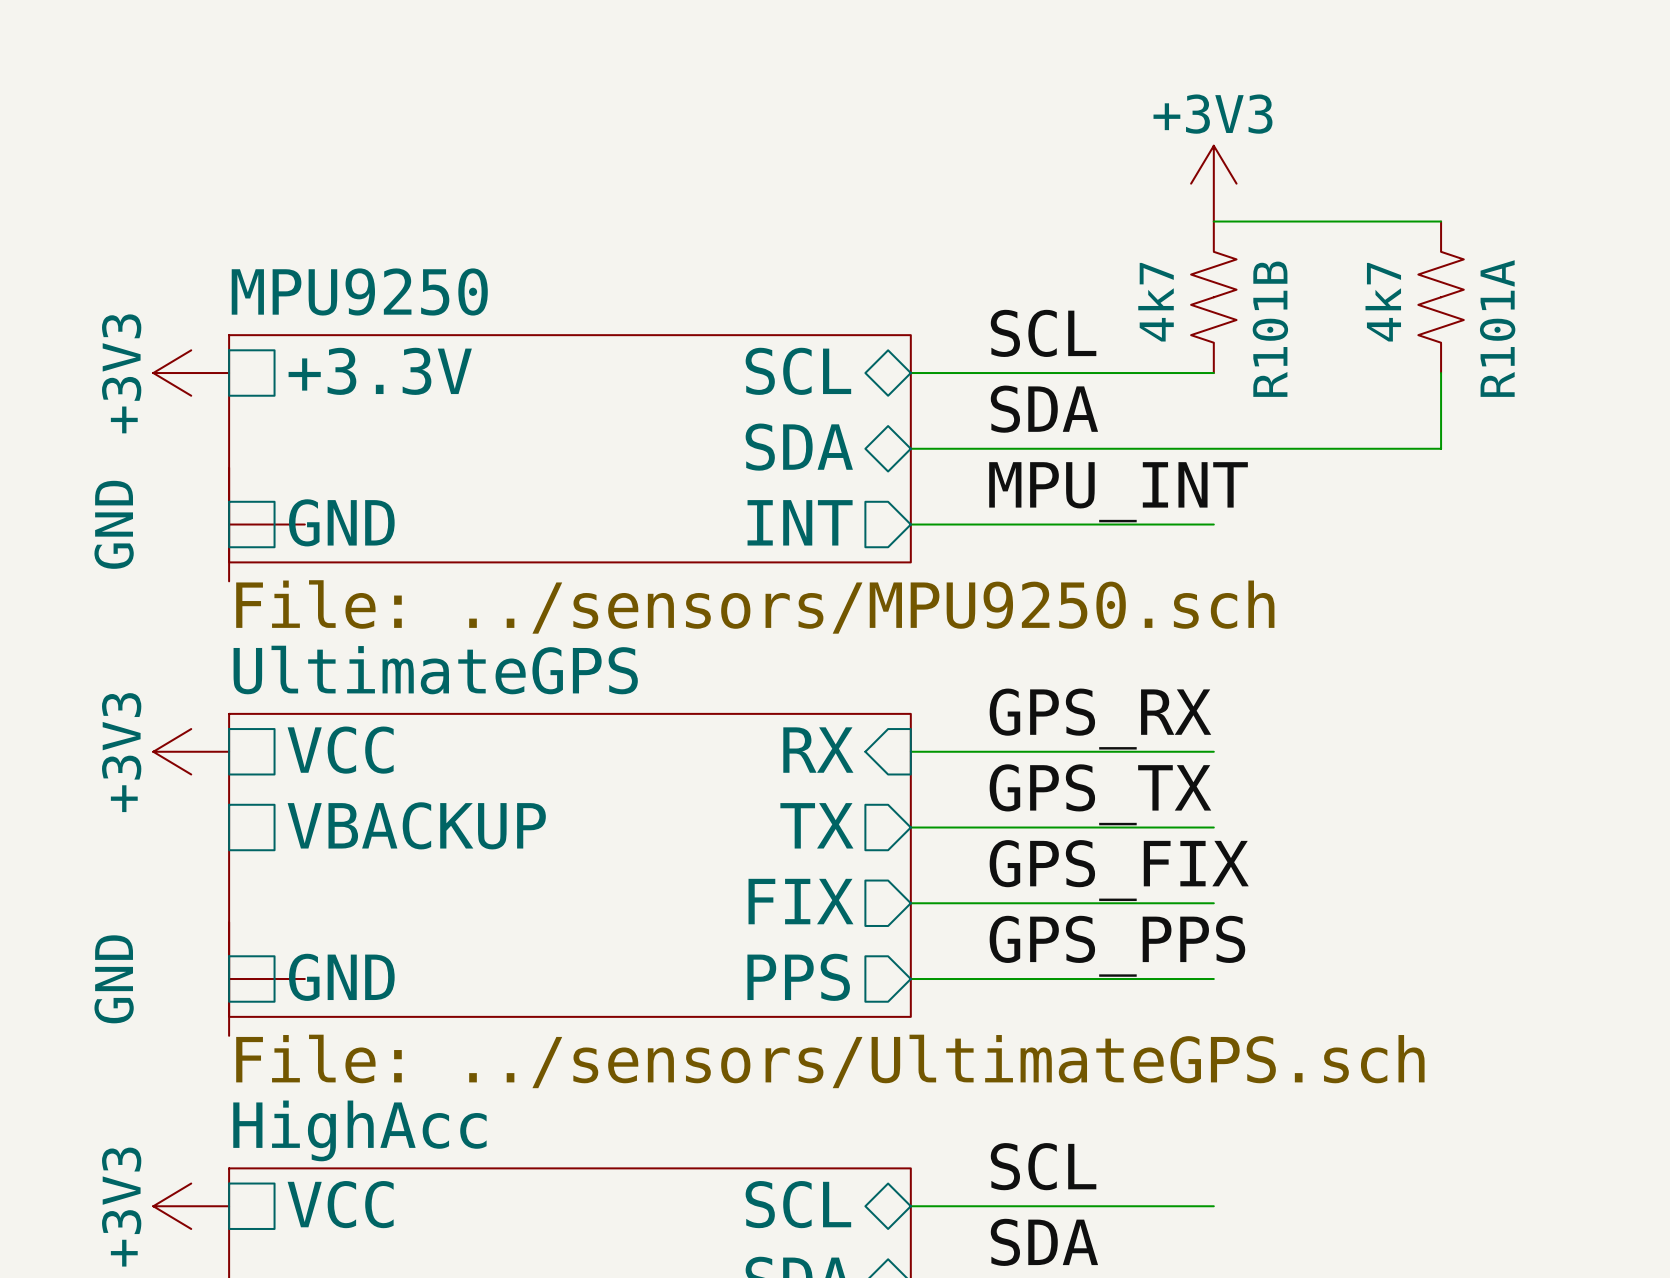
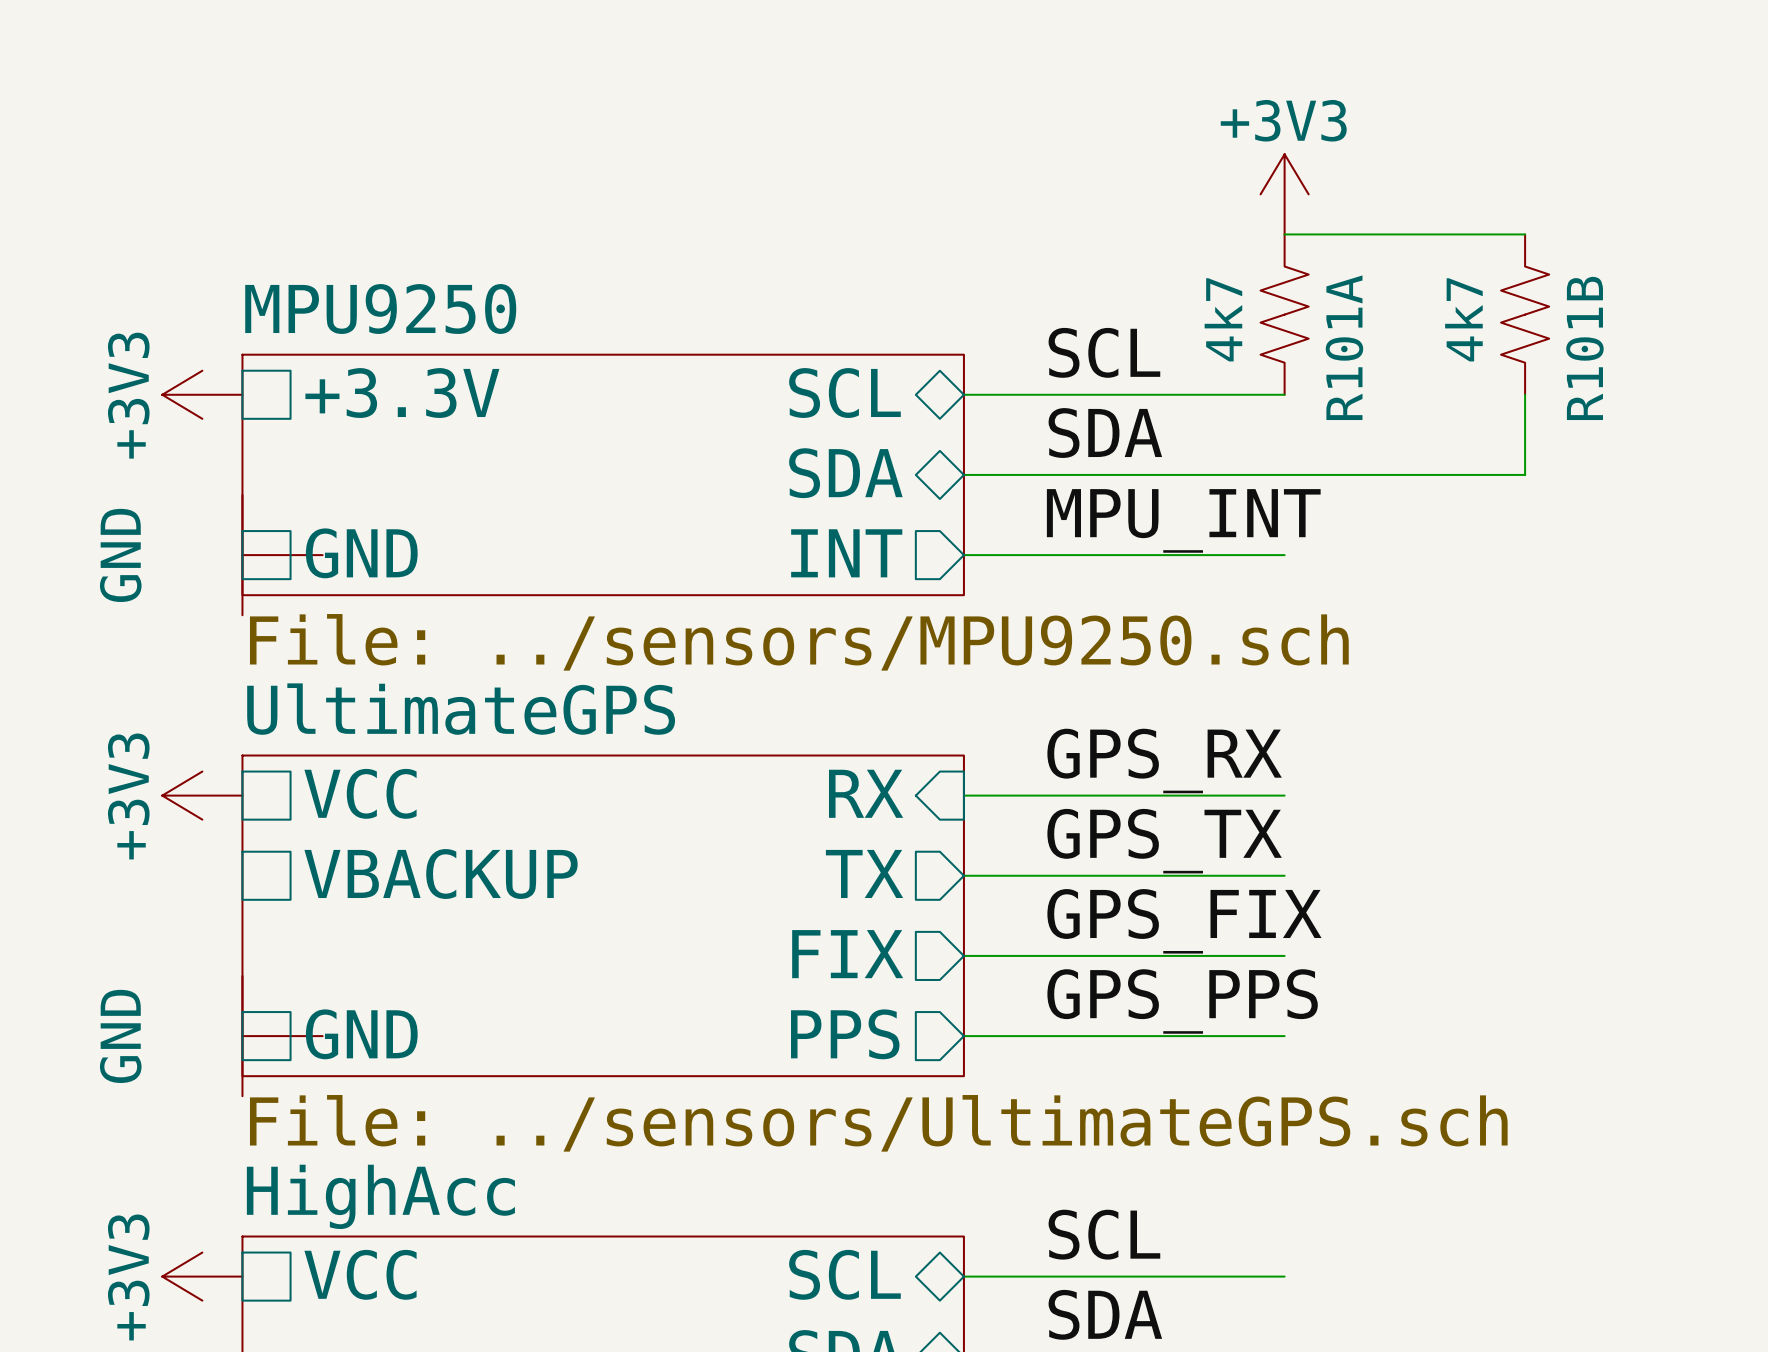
R101A name: R101A (1497, 328) -> R101B (1584, 348)
R101B name: R101B (1270, 329) -> R101A (1344, 347)

